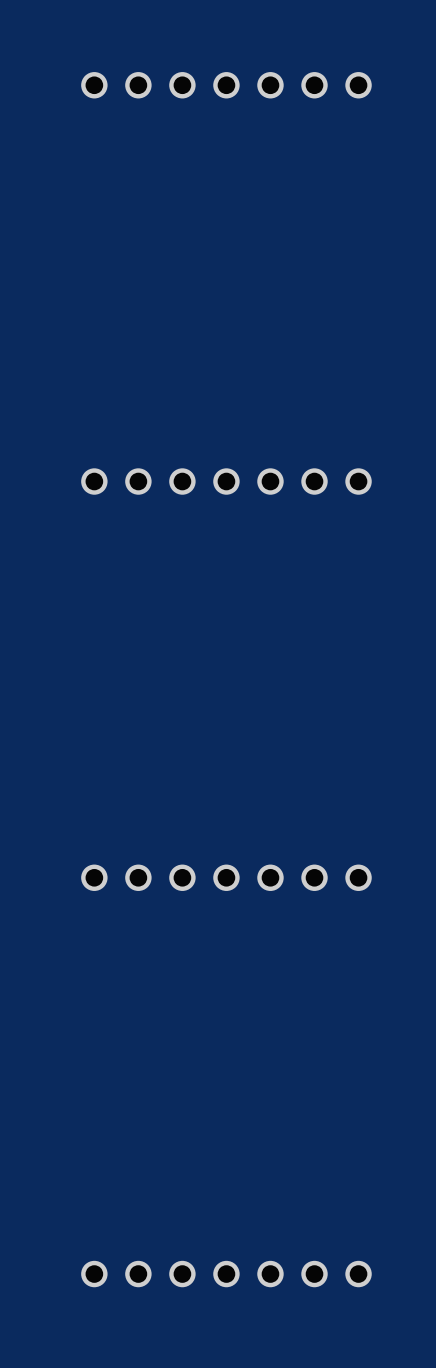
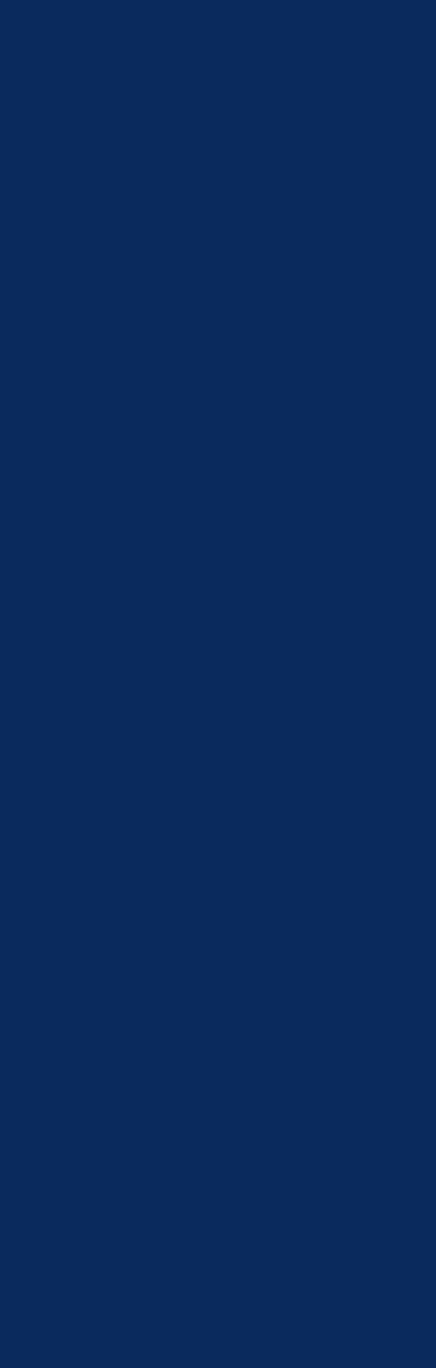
part: (226, 85) -> none
part: (226, 481) -> none
part: (226, 877) -> none
part: (226, 1274) -> none

